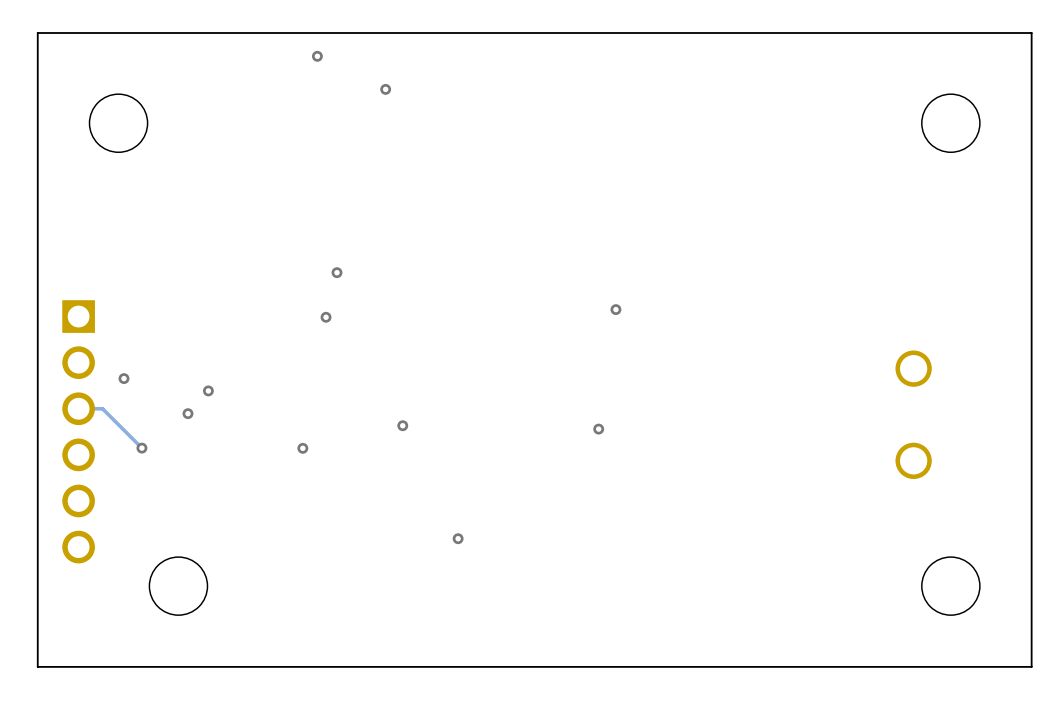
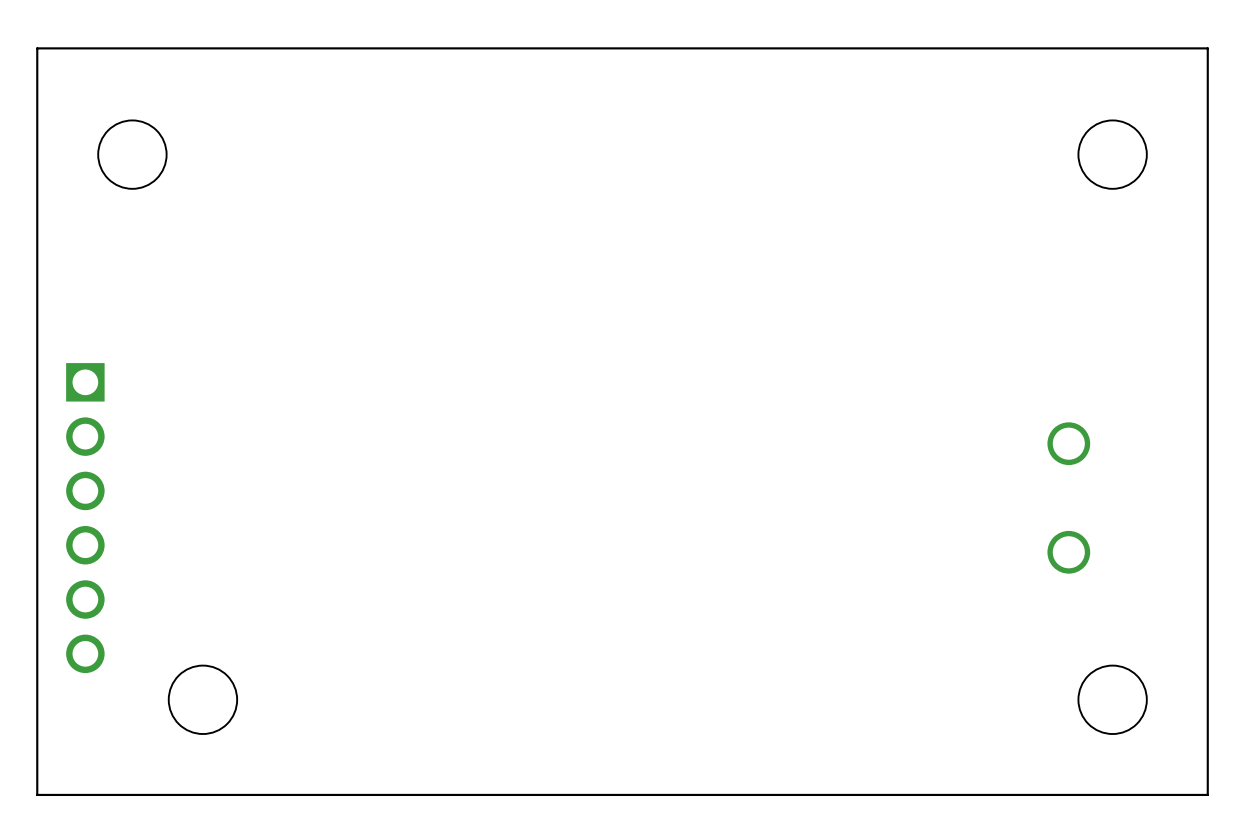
via: (317, 56) -> none
via: (385, 89) -> none
via: (336, 272) -> none
via: (615, 309) -> none
via: (326, 317) -> none
via: (123, 378) -> none
via: (208, 390) -> none
track: (78, 408) (102, 408) (141, 448) -> none
via: (187, 413) -> none
via: (402, 425) -> none
via: (598, 429) -> none
via: (141, 448) -> none
via: (302, 448) -> none
via: (458, 538) -> none

